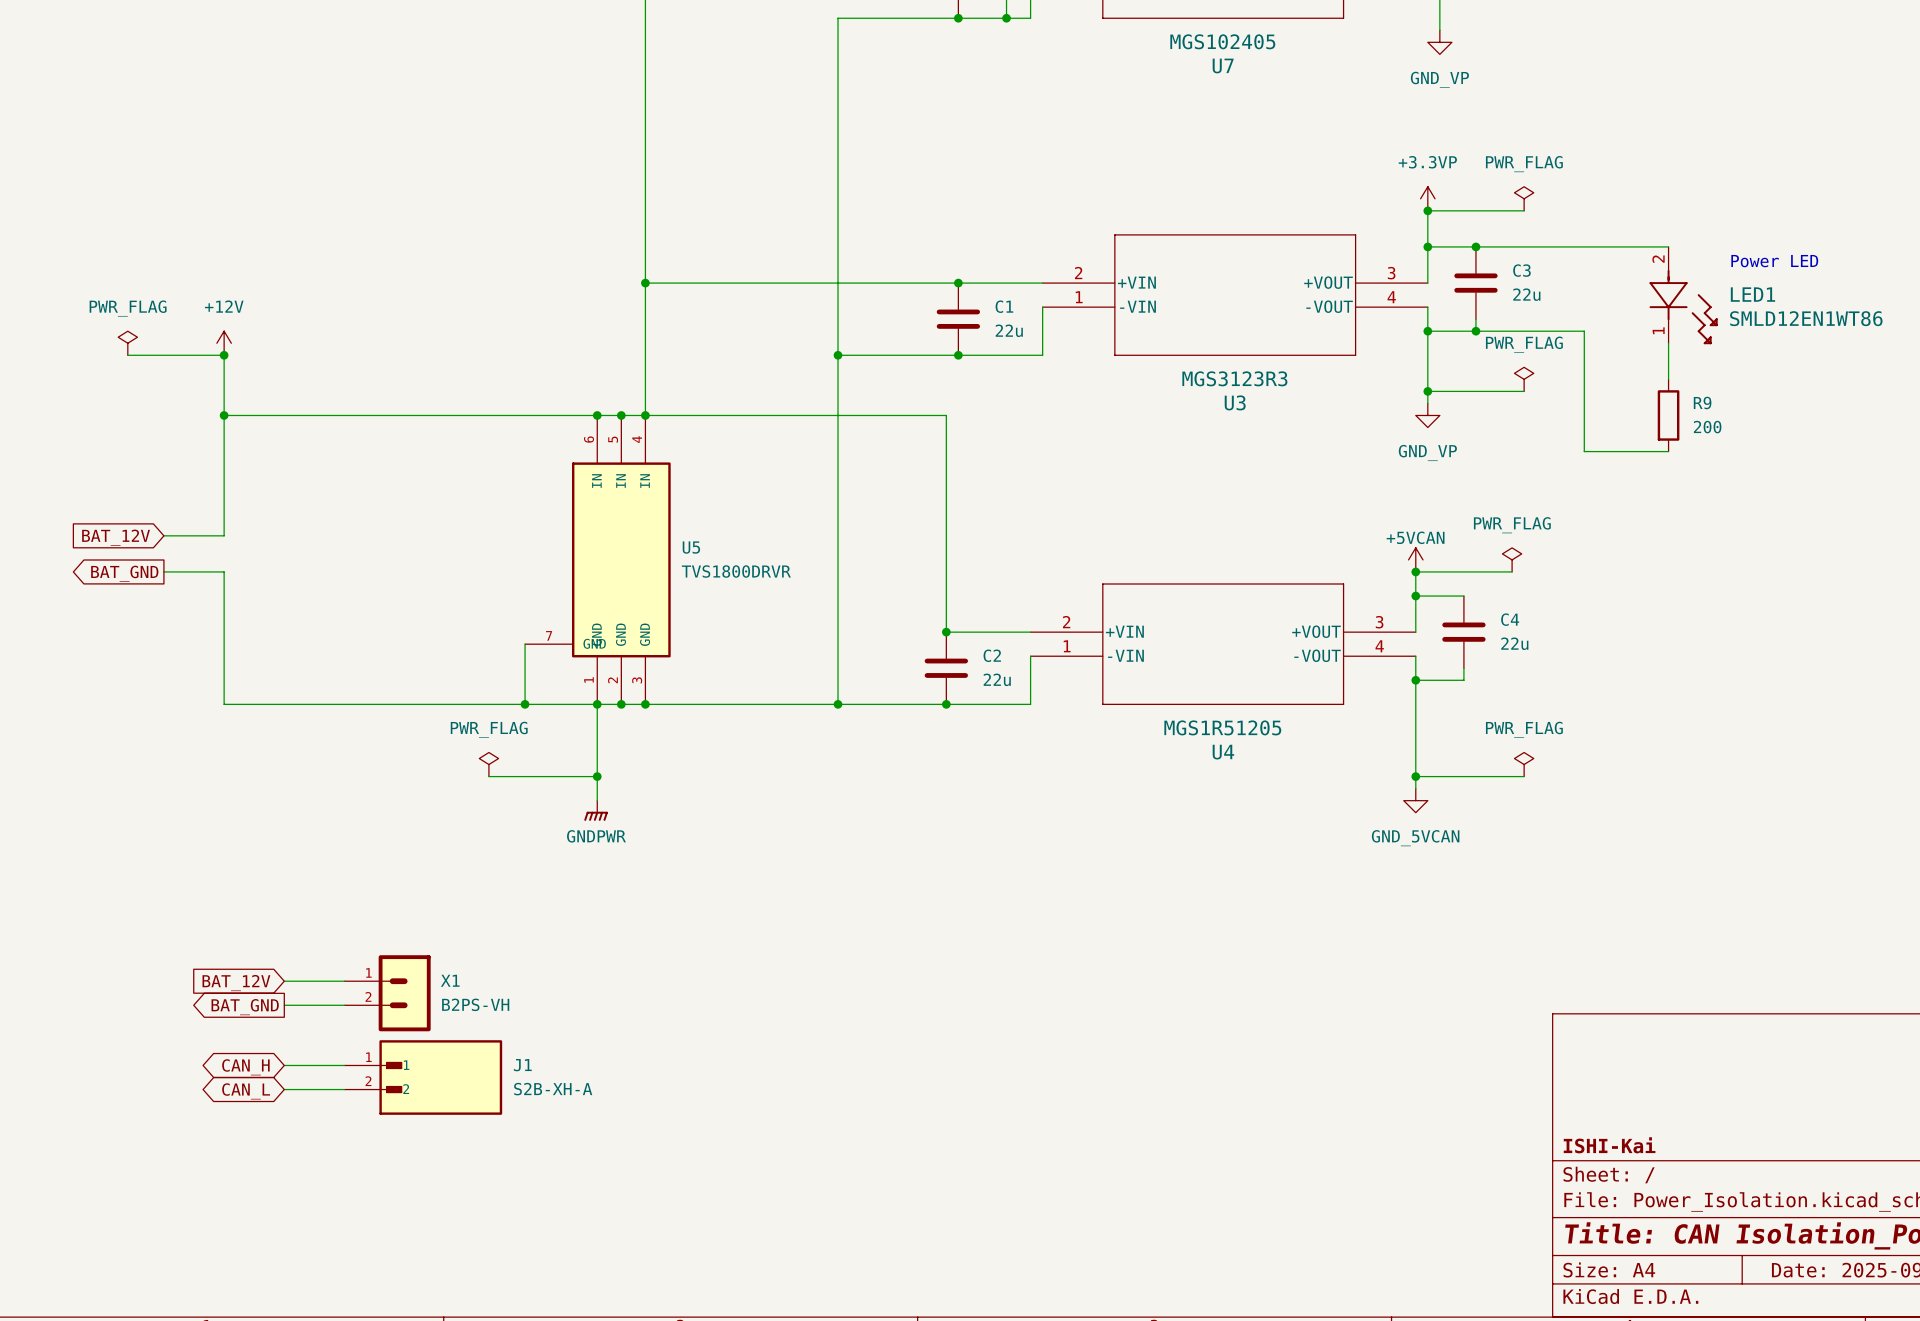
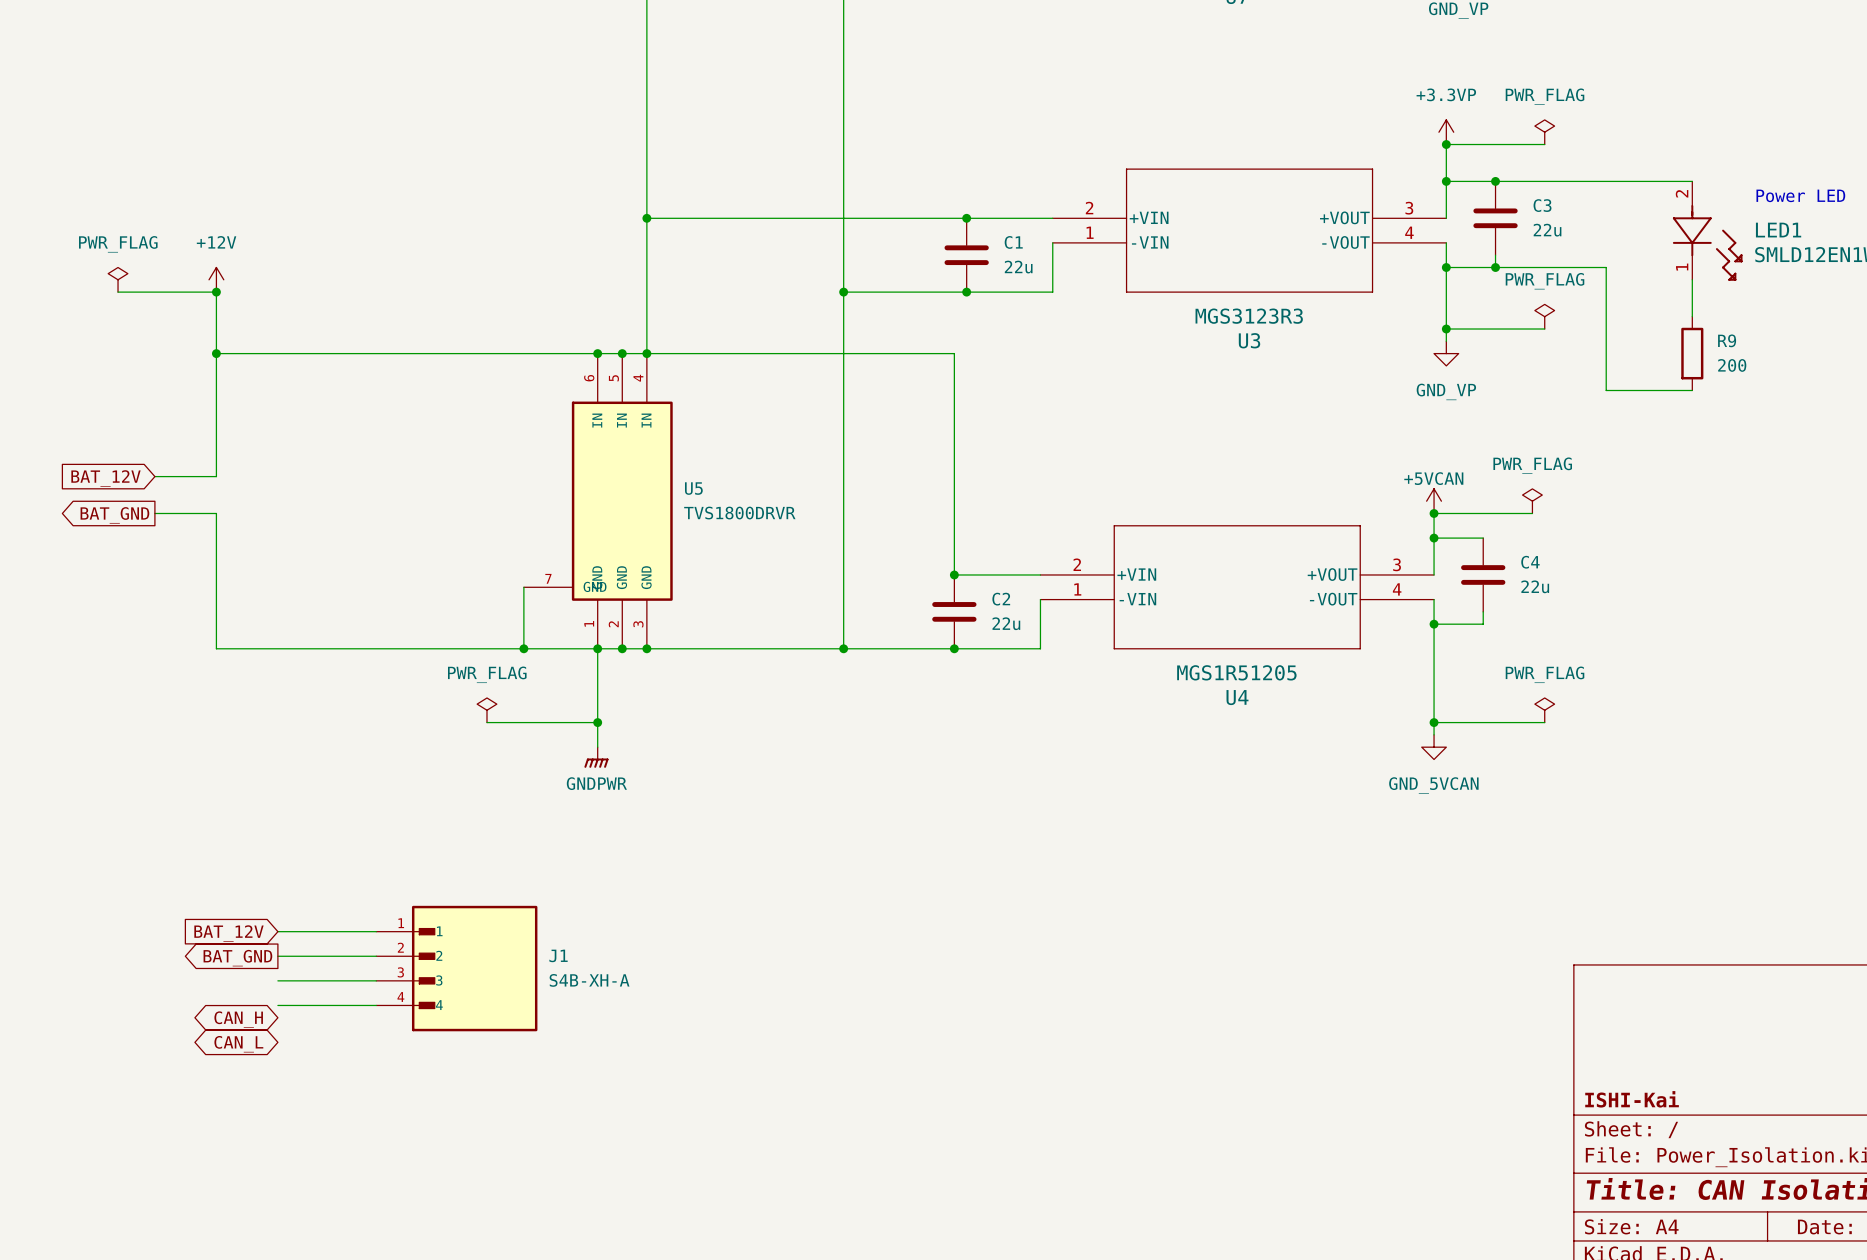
X1: B2PS-VH (387, 993) -> none
wire: none -> (277, 980) (376, 980)
J1 symbol: [344, 1040, 503, 1115] -> [376, 905, 538, 1032]
wire: none -> (277, 1005) (376, 1005)
wire: (284, 1065) (344, 1065) -> none
wire: (284, 1089) (344, 1089) -> none
J1 value: S2B-XH-A (553, 1089) -> S4B-XH-A (589, 980)

